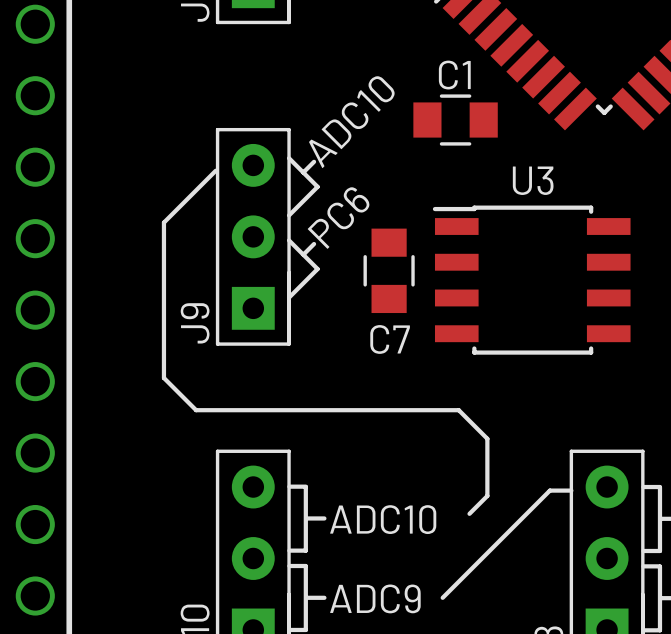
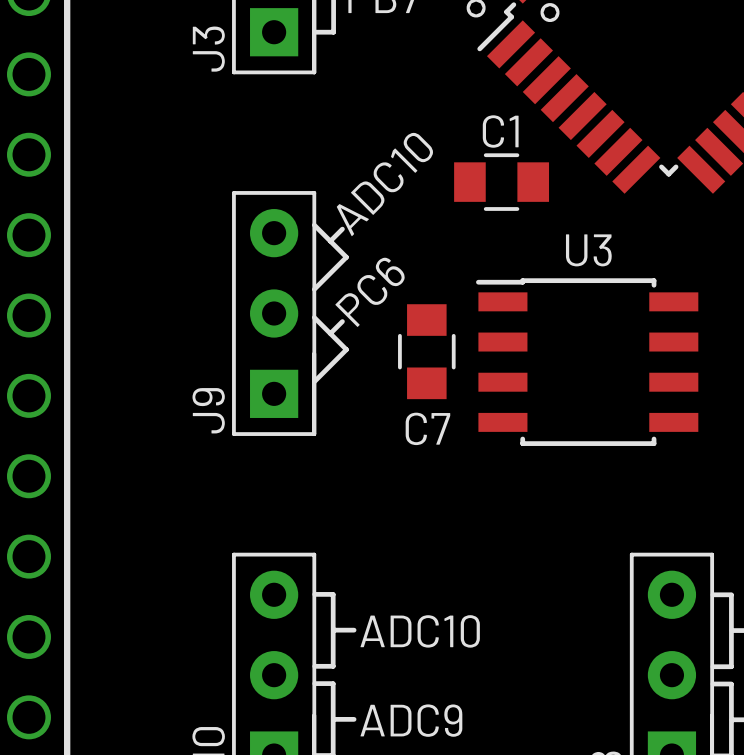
line: (215, 170) (163, 222) (163, 378) (196, 410) (458, 410) (487, 438) (487, 495) (469, 513) -> none
line: (571, 490) (549, 490) (442, 597) -> none

